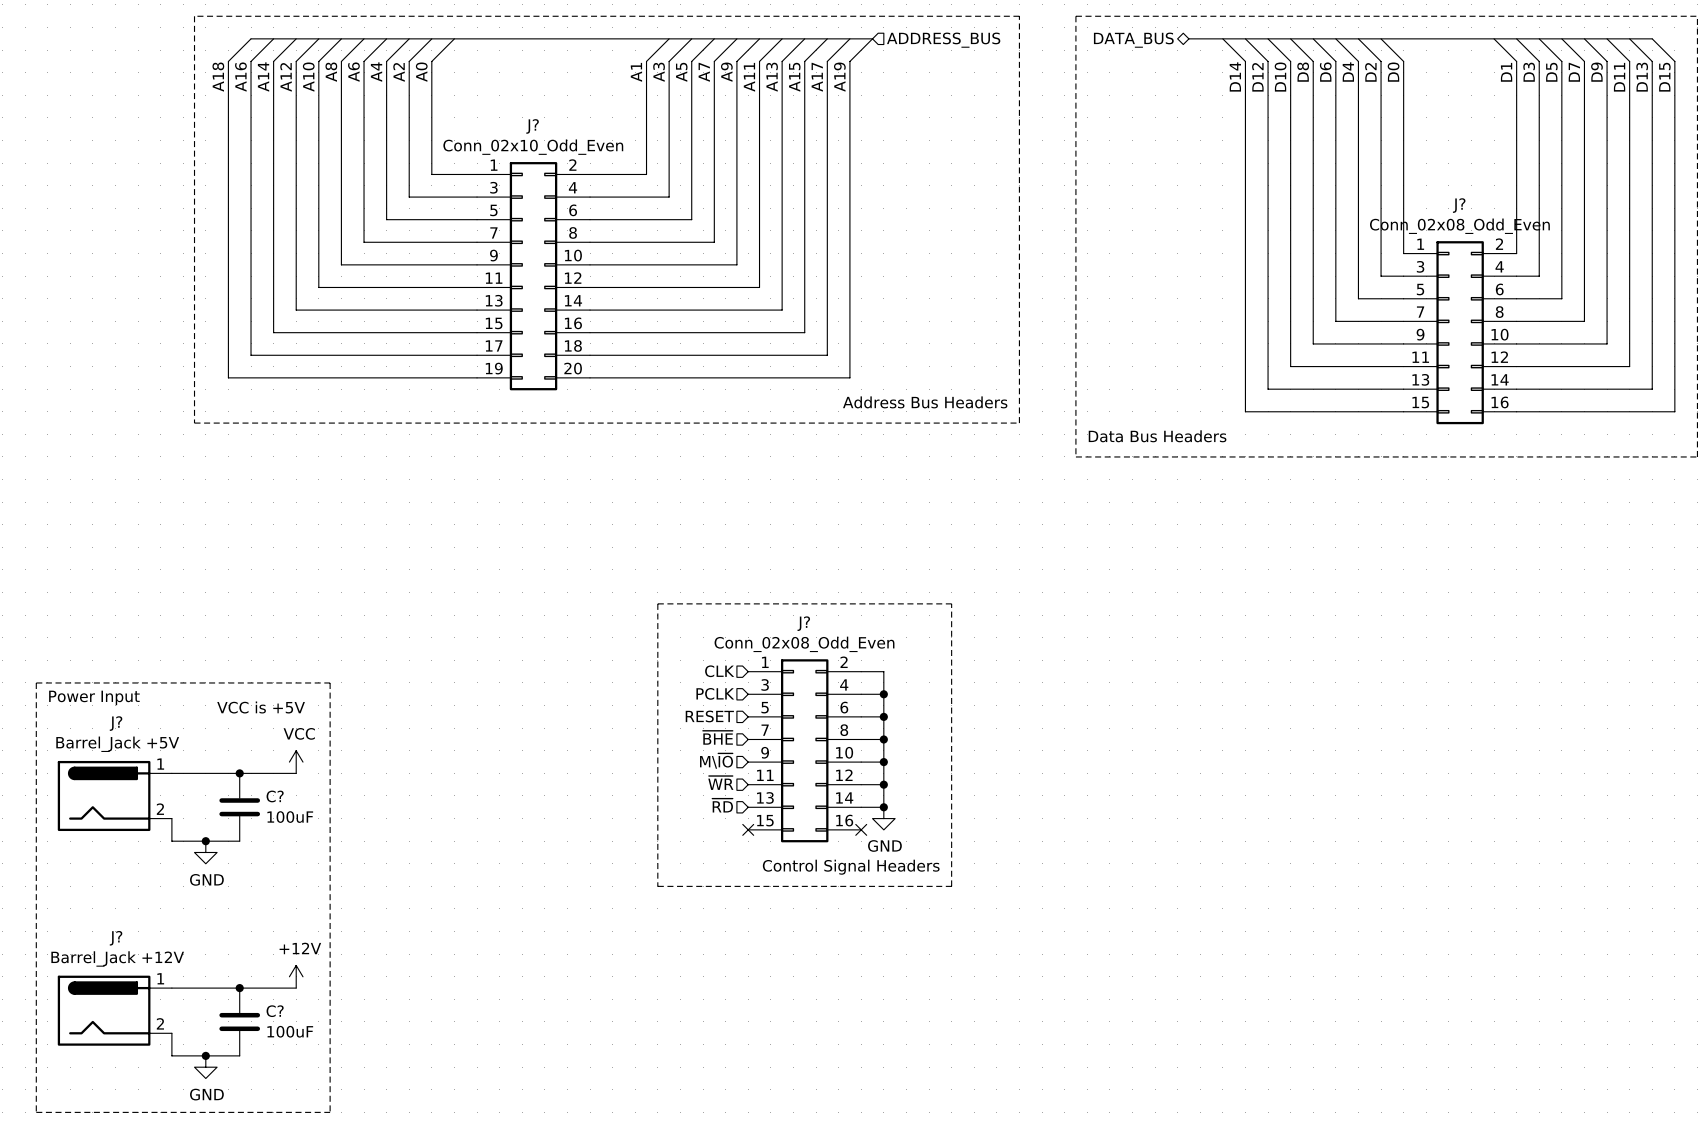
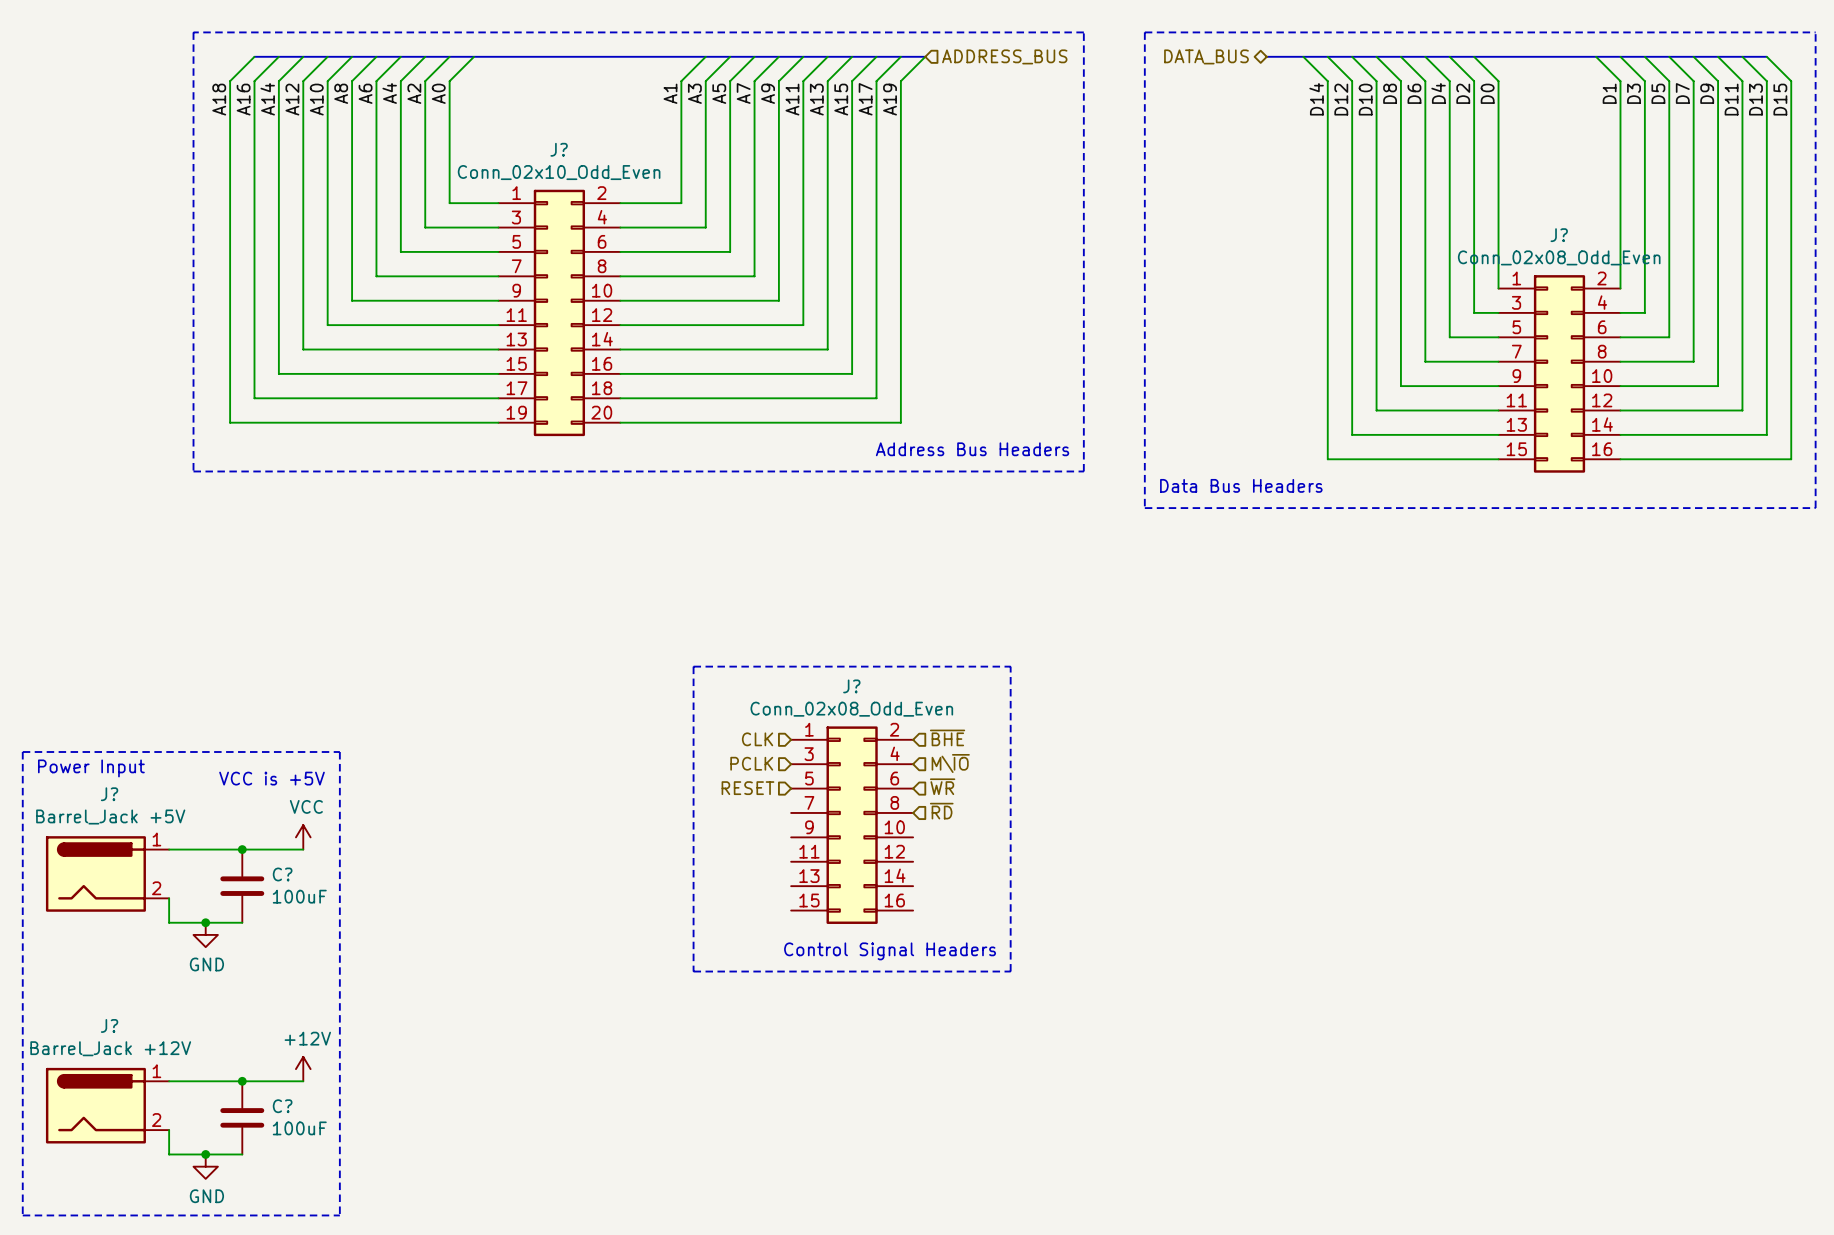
wire: (861, 671) (883, 671) (883, 807) (861, 807) -> none
wire: (861, 694) (883, 694) -> none
junction: (883, 694) -> none
wire: (861, 716) (883, 716) -> none
junction: (883, 716) -> none
hierarchical label rotation: 0° (717, 737) -> 180° (947, 737)
hierarchical label position: ~{BHE} (717, 737) -> ~{BHE} (947, 737)
wire: (861, 739) (883, 739) -> none
junction: (883, 739) -> none
hierarchical label rotation: 0° (716, 761) -> 180° (950, 763)
hierarchical label position: M\~{IO} (716, 761) -> M\~{IO} (950, 763)
wire: (861, 762) (883, 762) -> none
junction: (883, 762) -> none
hierarchical label rotation: 0° (720, 782) -> 180° (942, 786)
hierarchical label position: ~{WR} (720, 782) -> ~{WR} (942, 786)
wire: (861, 784) (883, 784) -> none
junction: (883, 784) -> none
hierarchical label rotation: 0° (722, 805) -> 180° (941, 811)
hierarchical label position: ~{RD} (722, 805) -> ~{RD} (941, 811)
junction: (883, 807) -> none
power symbol: GND (883, 818) -> none
no-connect mark: (748, 829) -> none
no-connect mark: (861, 829) -> none

